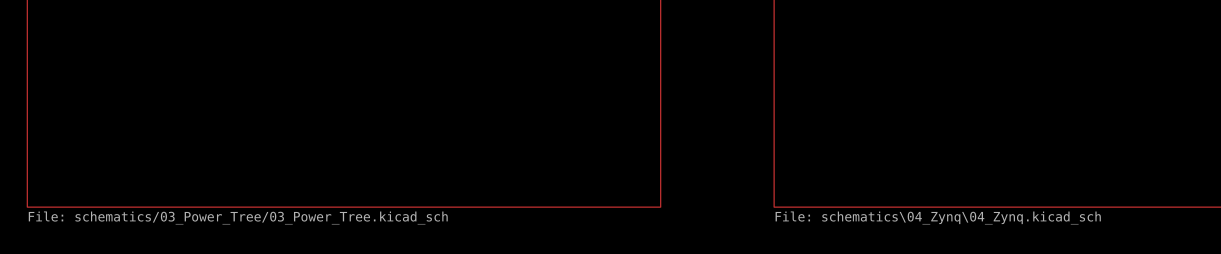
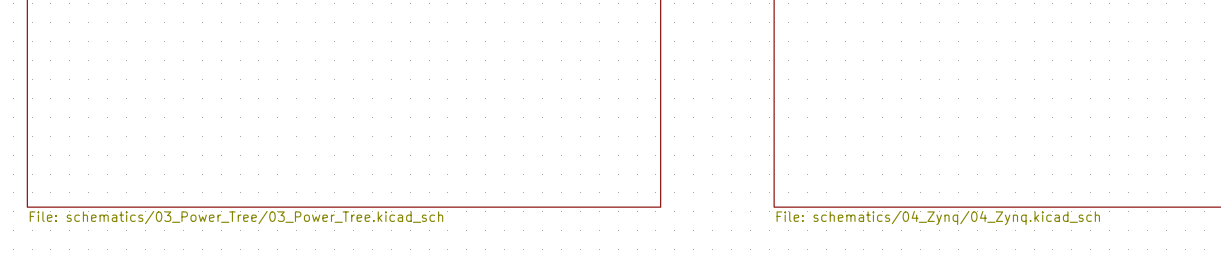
sheet value: File: schematics\04_Zynq\04_Zynq.kicad_sch (938, 217) -> File: schematics/04_Zynq/04_Zynq.kicad_sch (938, 218)

